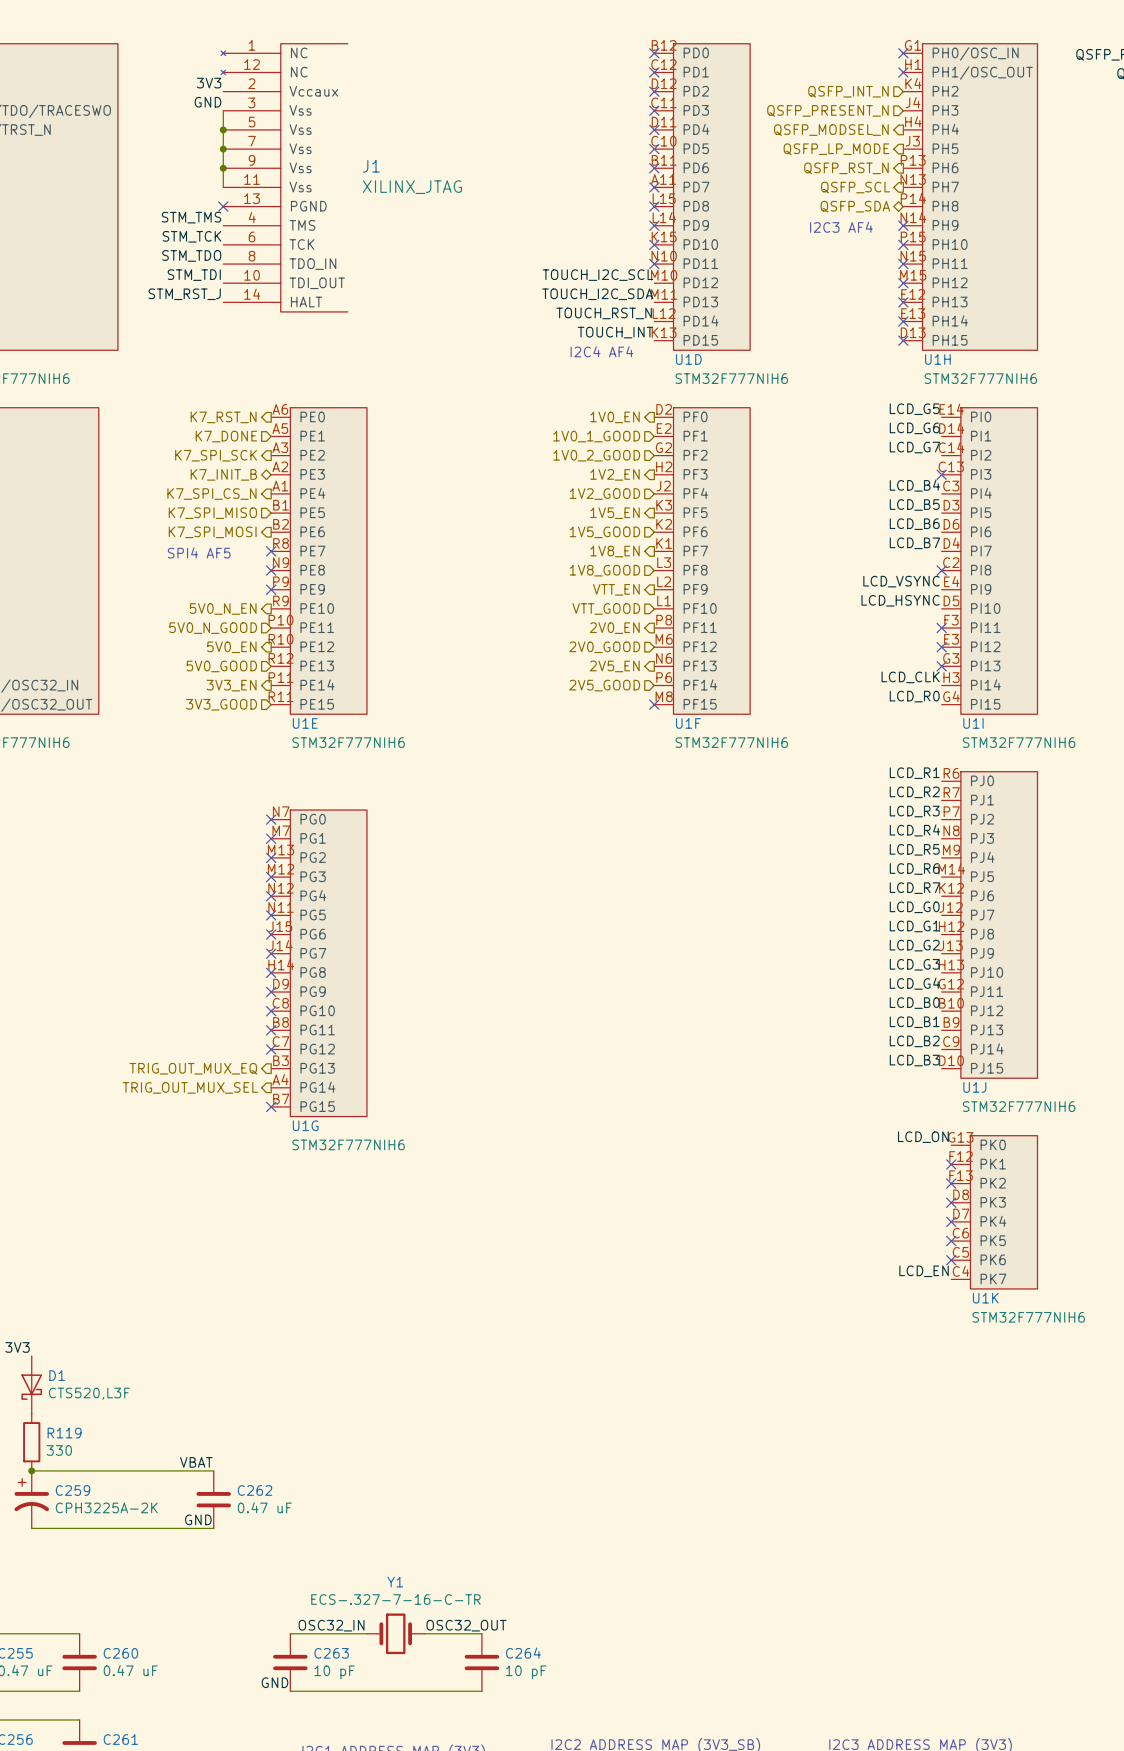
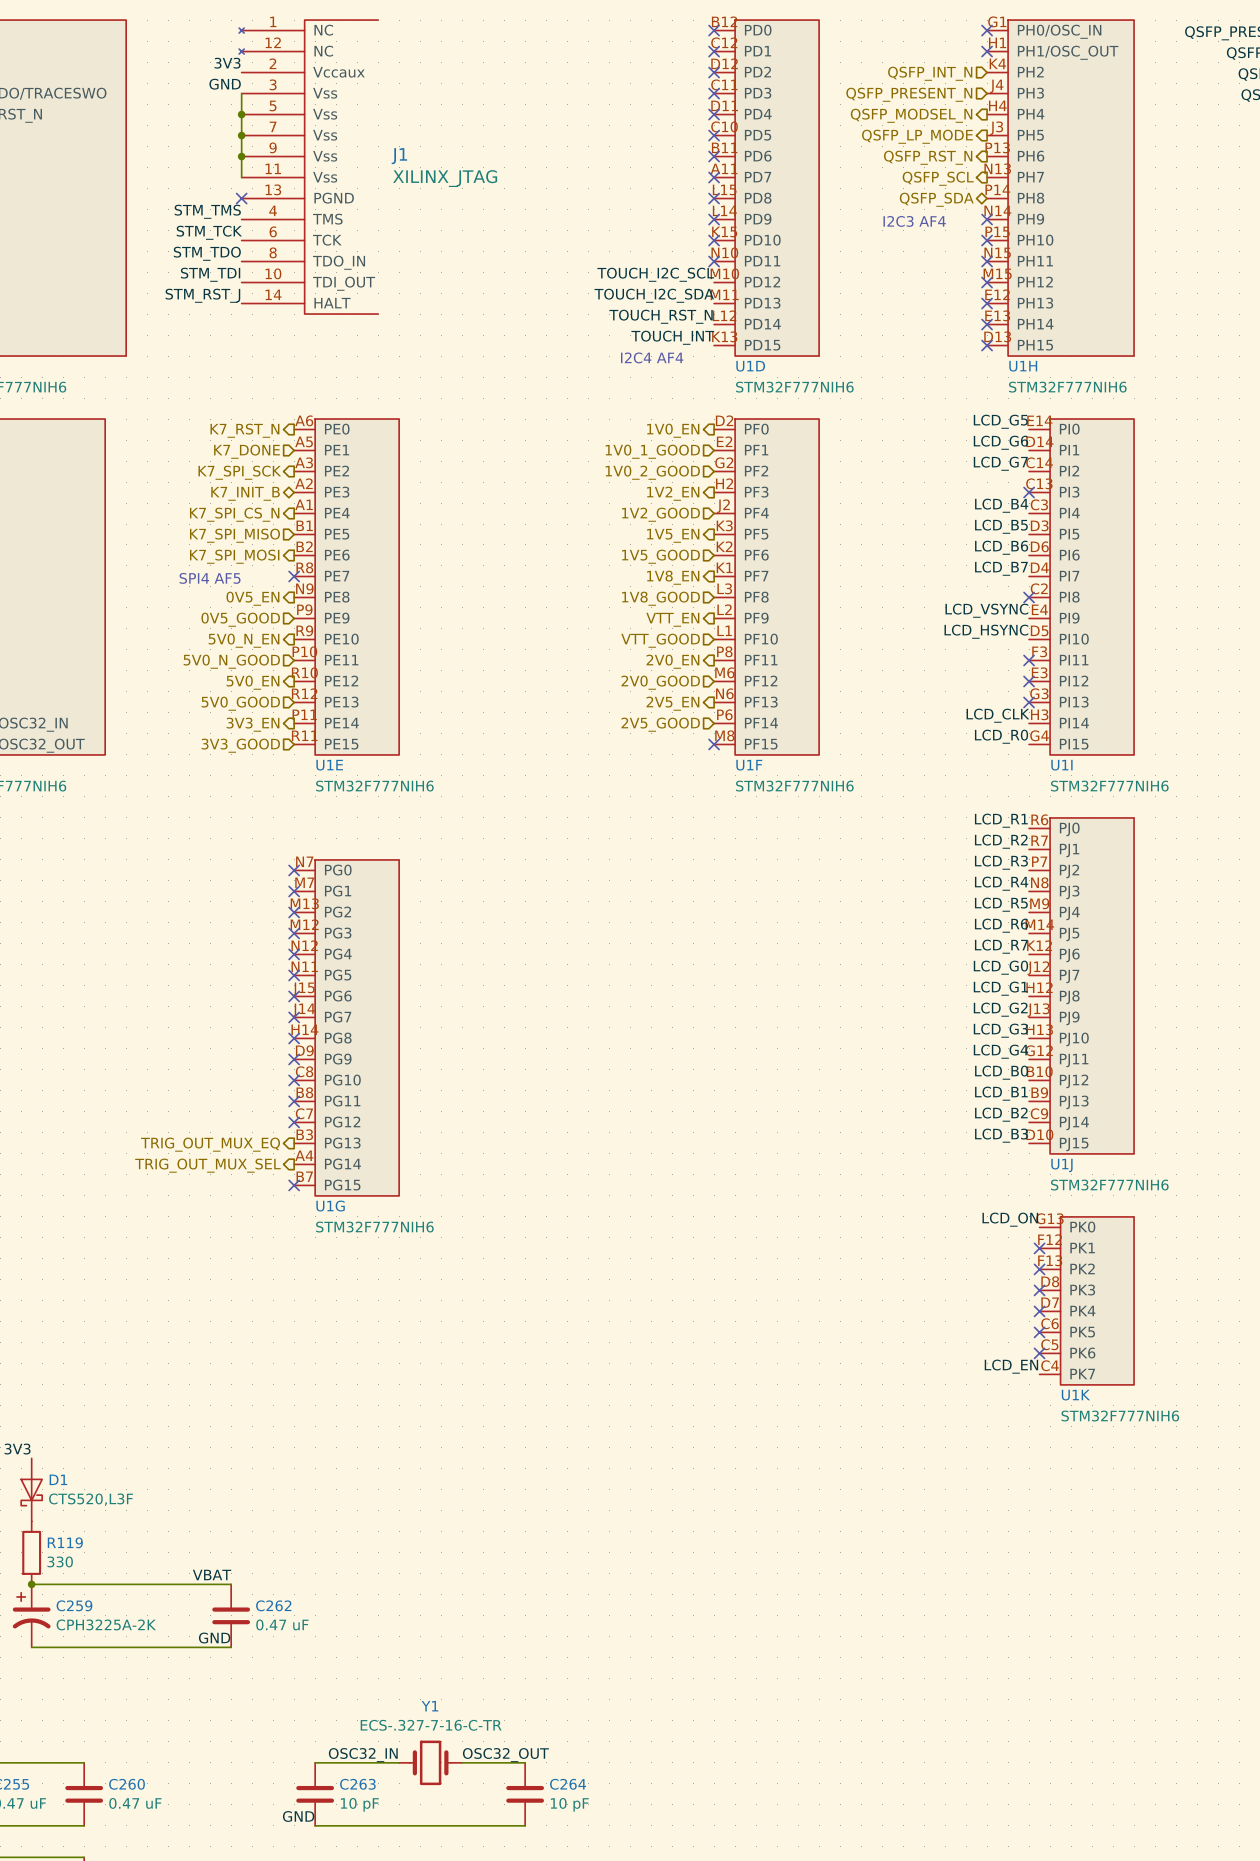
hierarchical label: none -> 0V5_EN (252, 598)
no-connect mark: (271, 570) -> none
hierarchical label: none -> 0V5_GOOD (240, 619)
no-connect mark: (271, 589) -> none

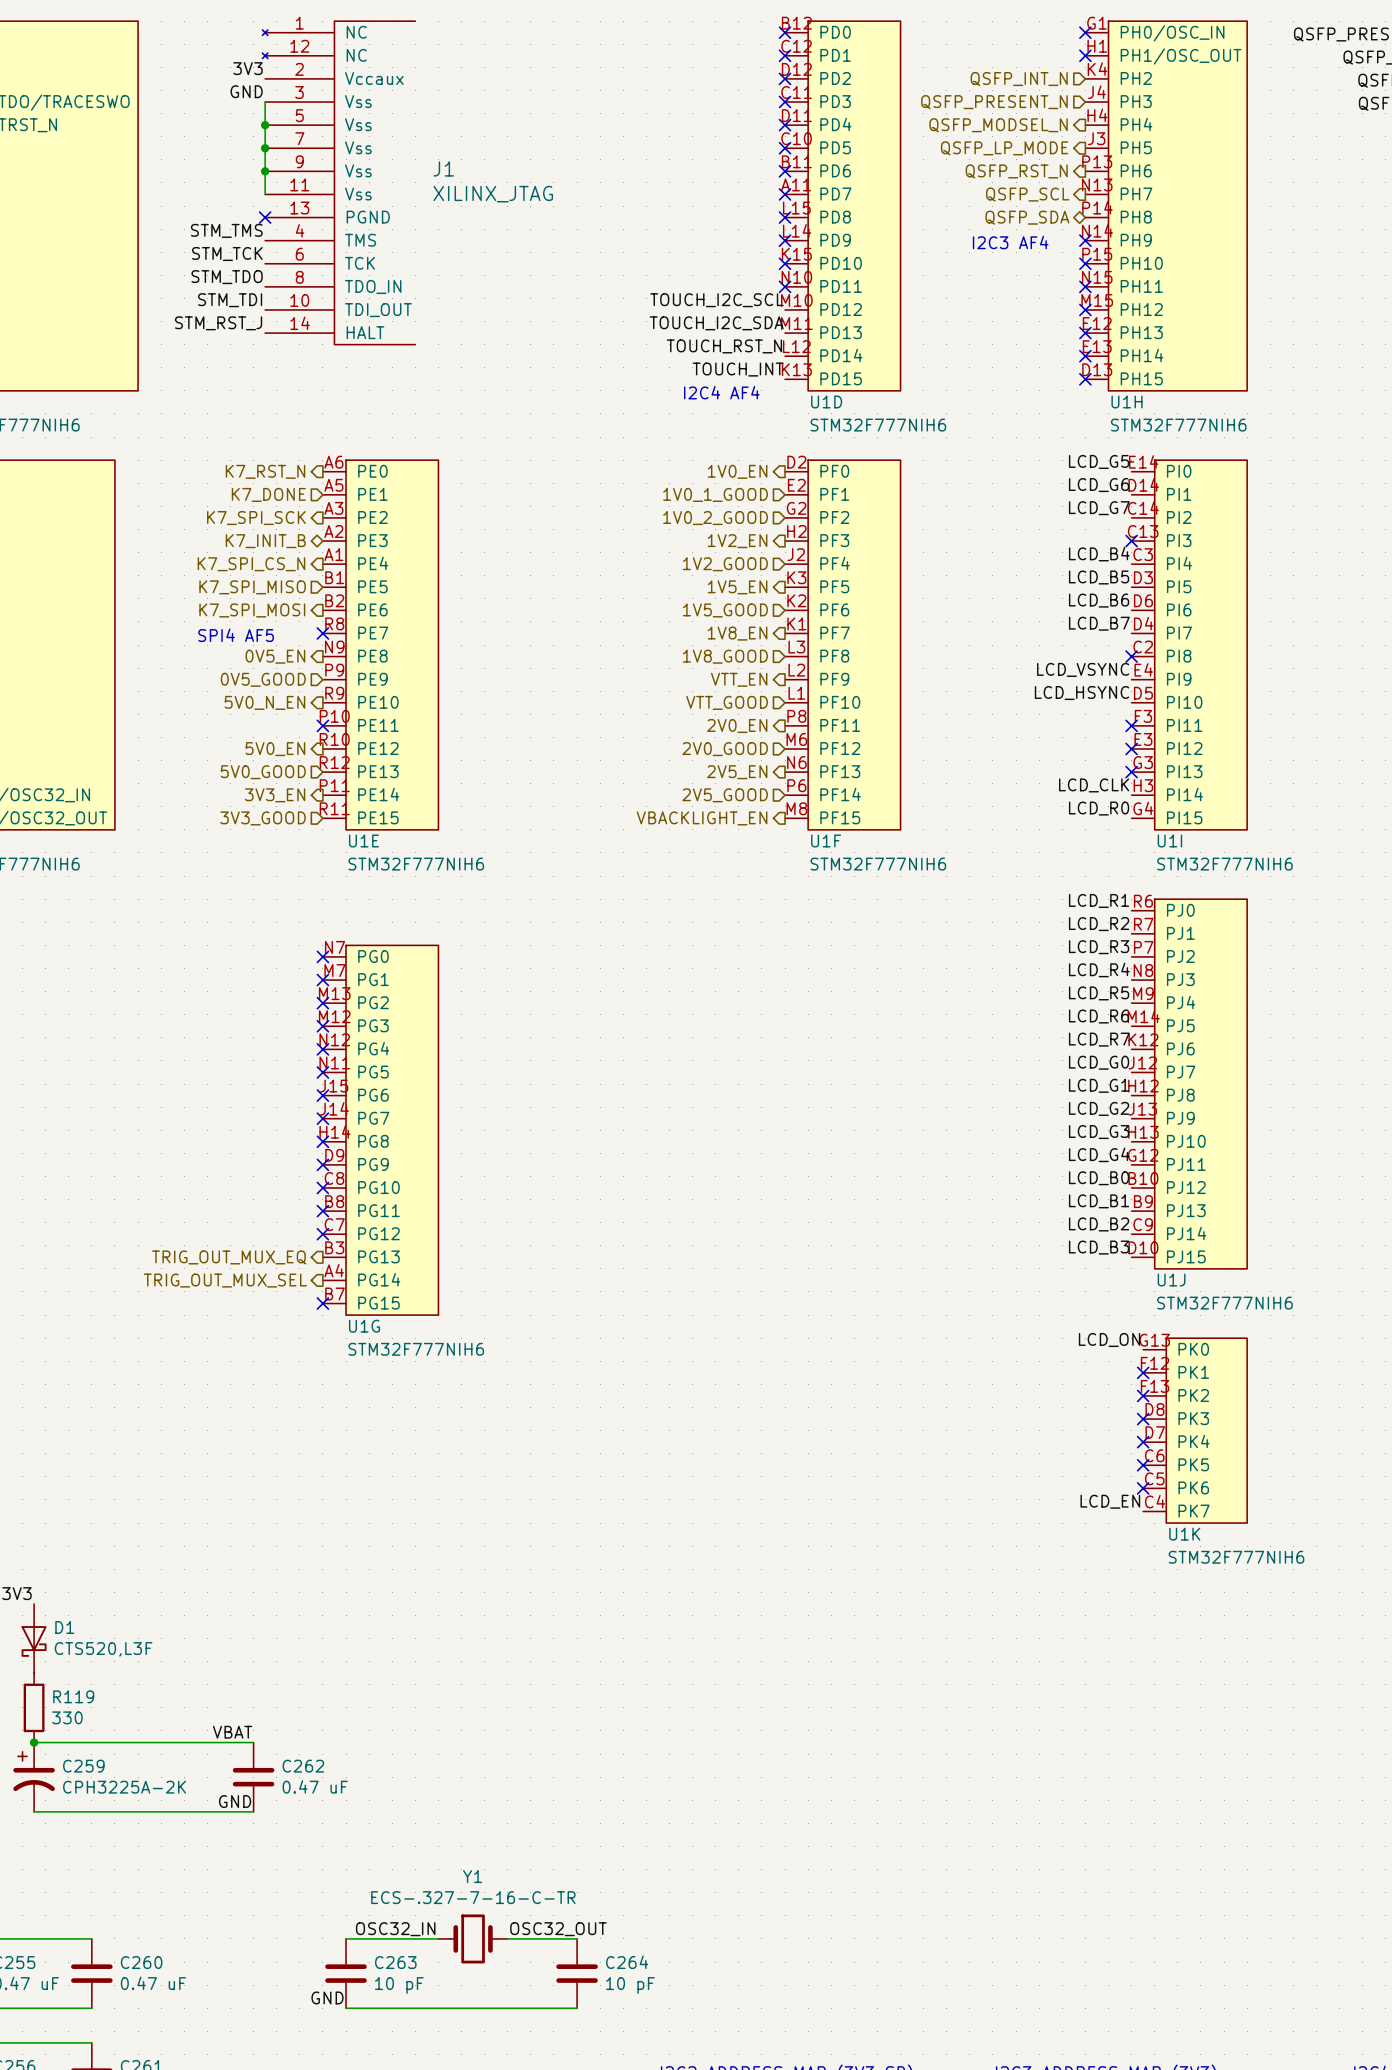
no-connect mark: none -> (322, 725)
hierarchical label: 5V0_N_GOOD (231, 661) -> none
no-connect mark: (714, 744) -> none
hierarchical label: none -> VBACKLIGHT_EN (702, 818)

